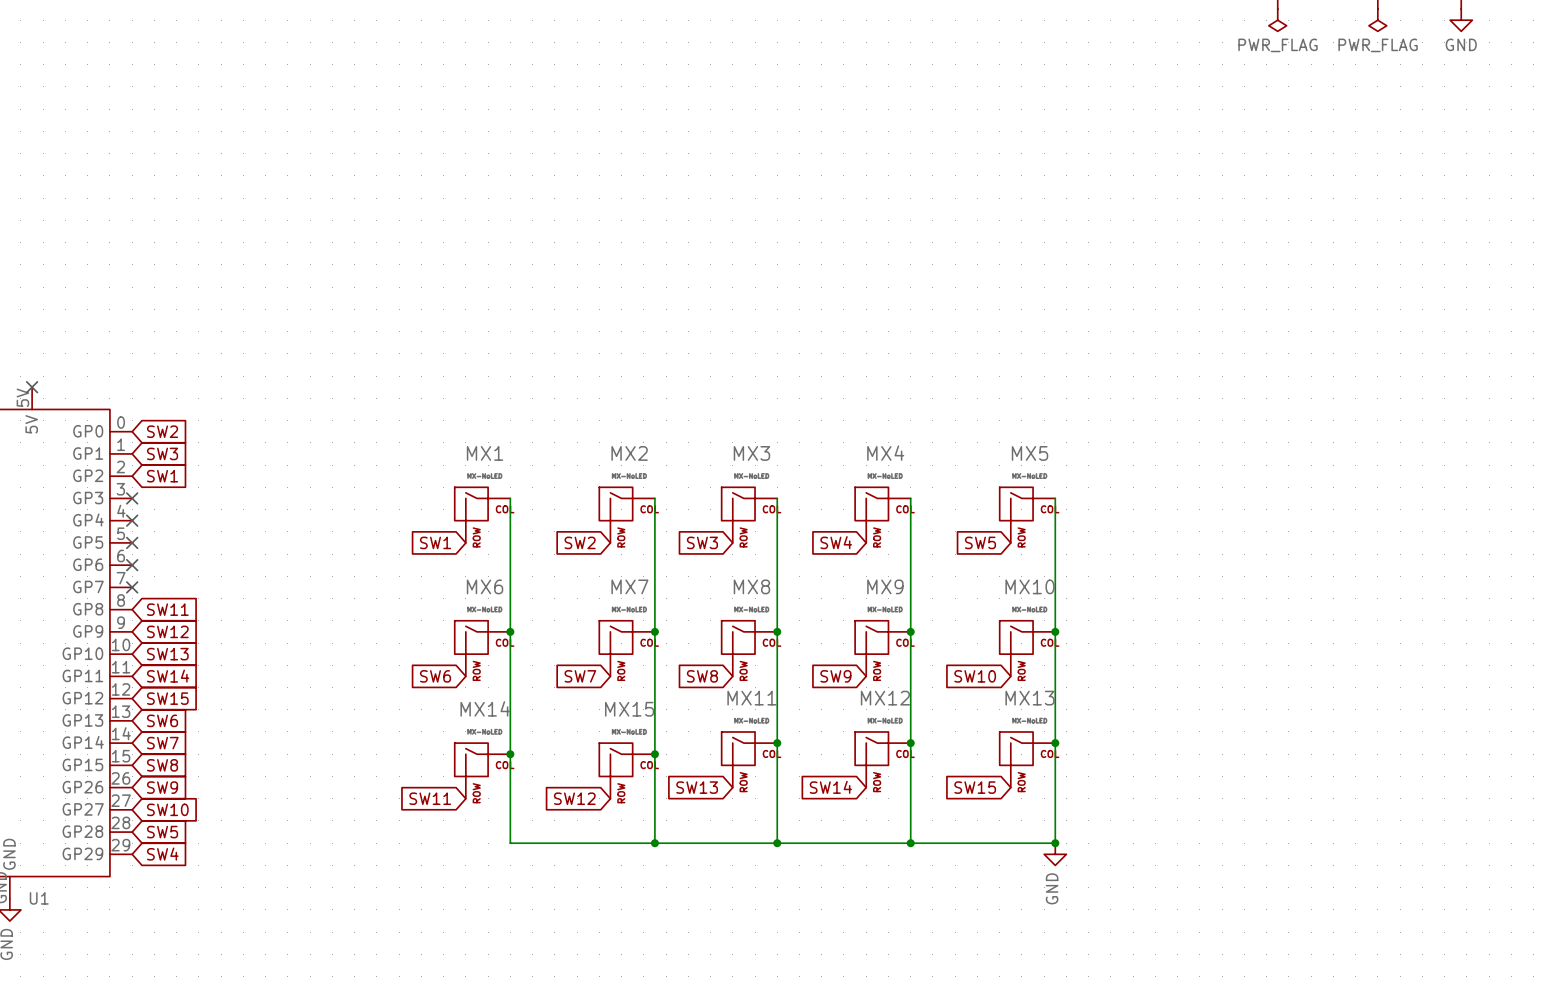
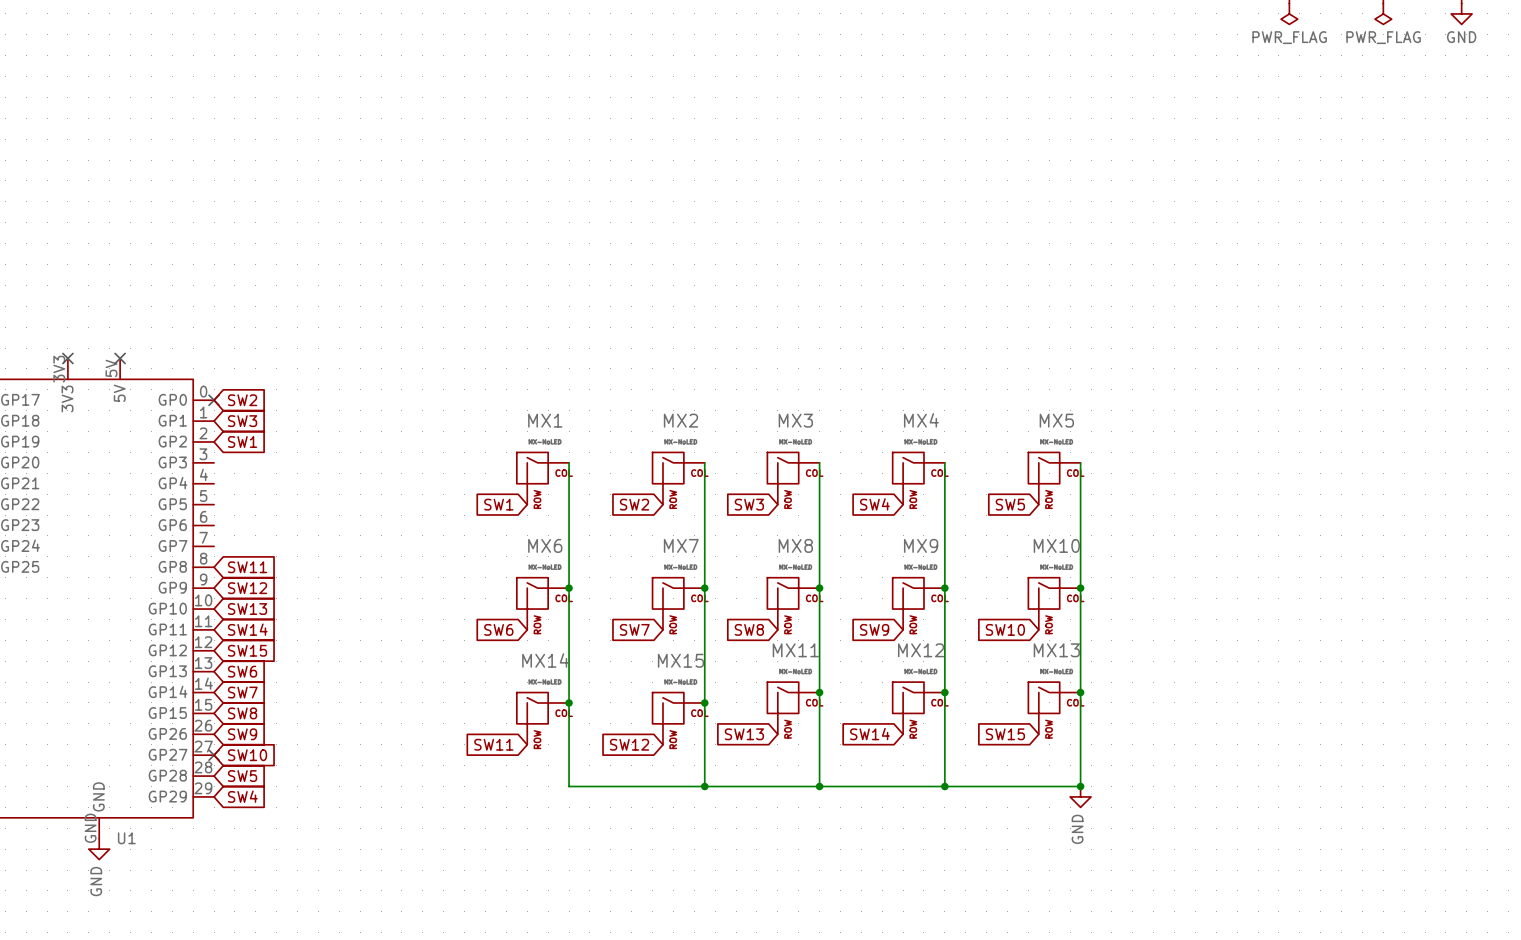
no-connect mark: none -> (214, 400)
no-connect mark: (132, 498) -> none
no-connect mark: (132, 520) -> none
no-connect mark: (132, 542) -> none
no-connect mark: (132, 565) -> none
no-connect mark: (132, 587) -> none
no-connect mark: none -> (214, 755)

